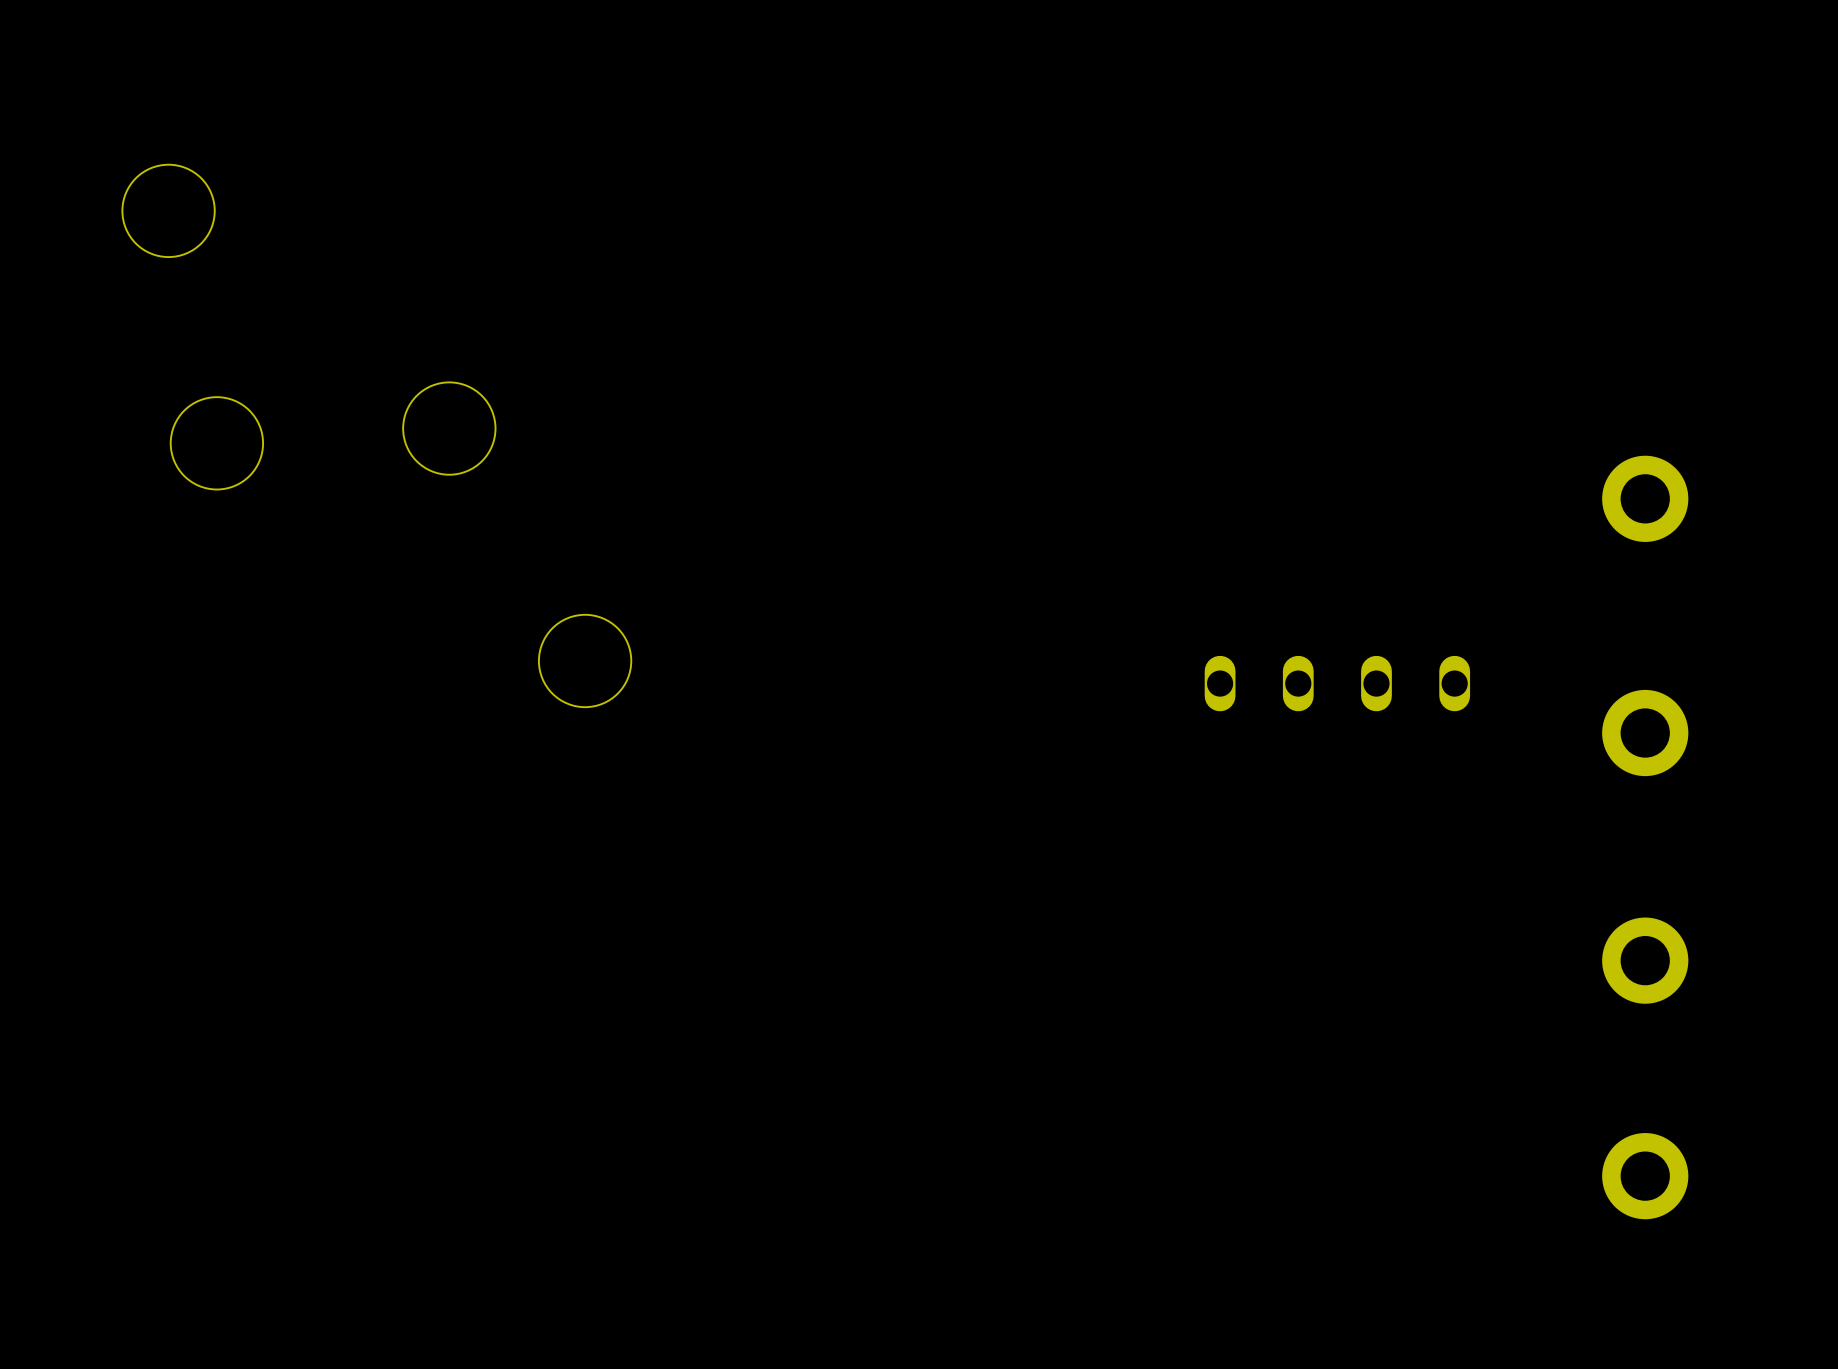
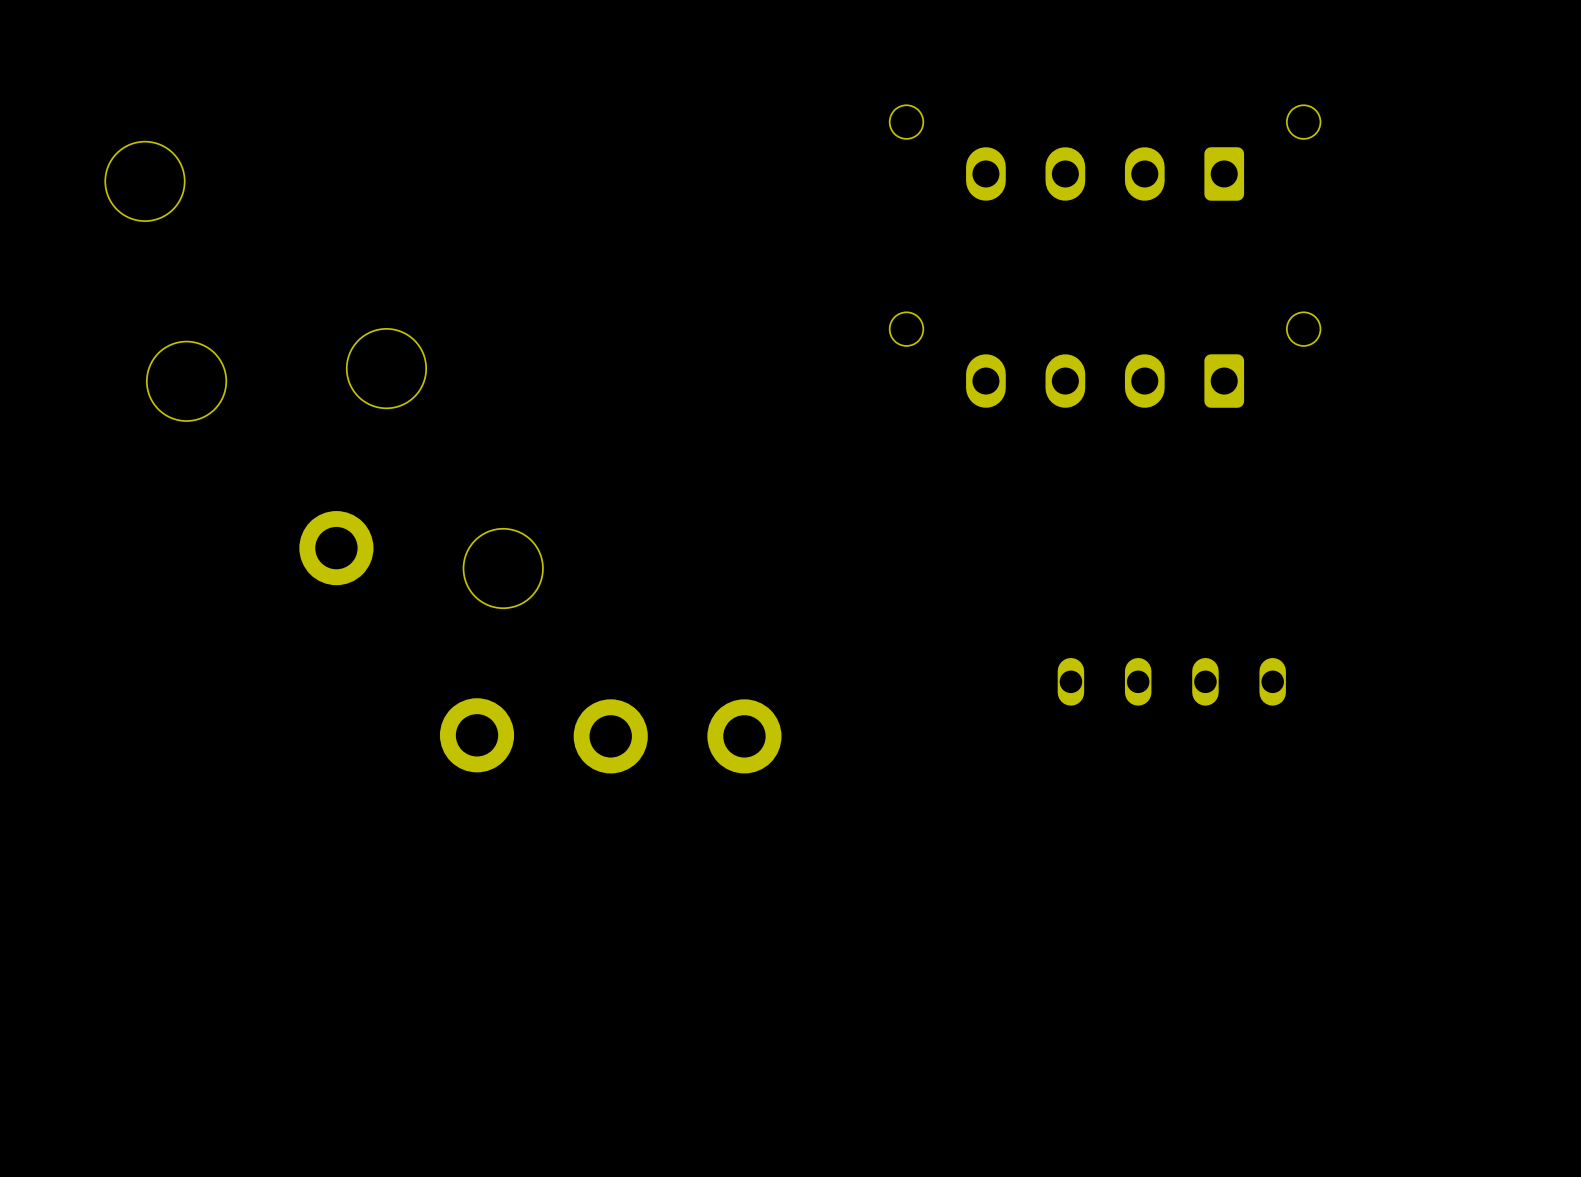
part: none -> (1105, 152)
part: none -> (1105, 360)
part: (1645, 498) -> none
part: none -> (336, 548)
part position: (1337, 683) -> (1171, 681)
part: (1645, 733) -> none
part: none -> (477, 735)
part: none -> (610, 736)
part: none -> (744, 736)
part: (1645, 960) -> none
part: (1645, 1176) -> none

